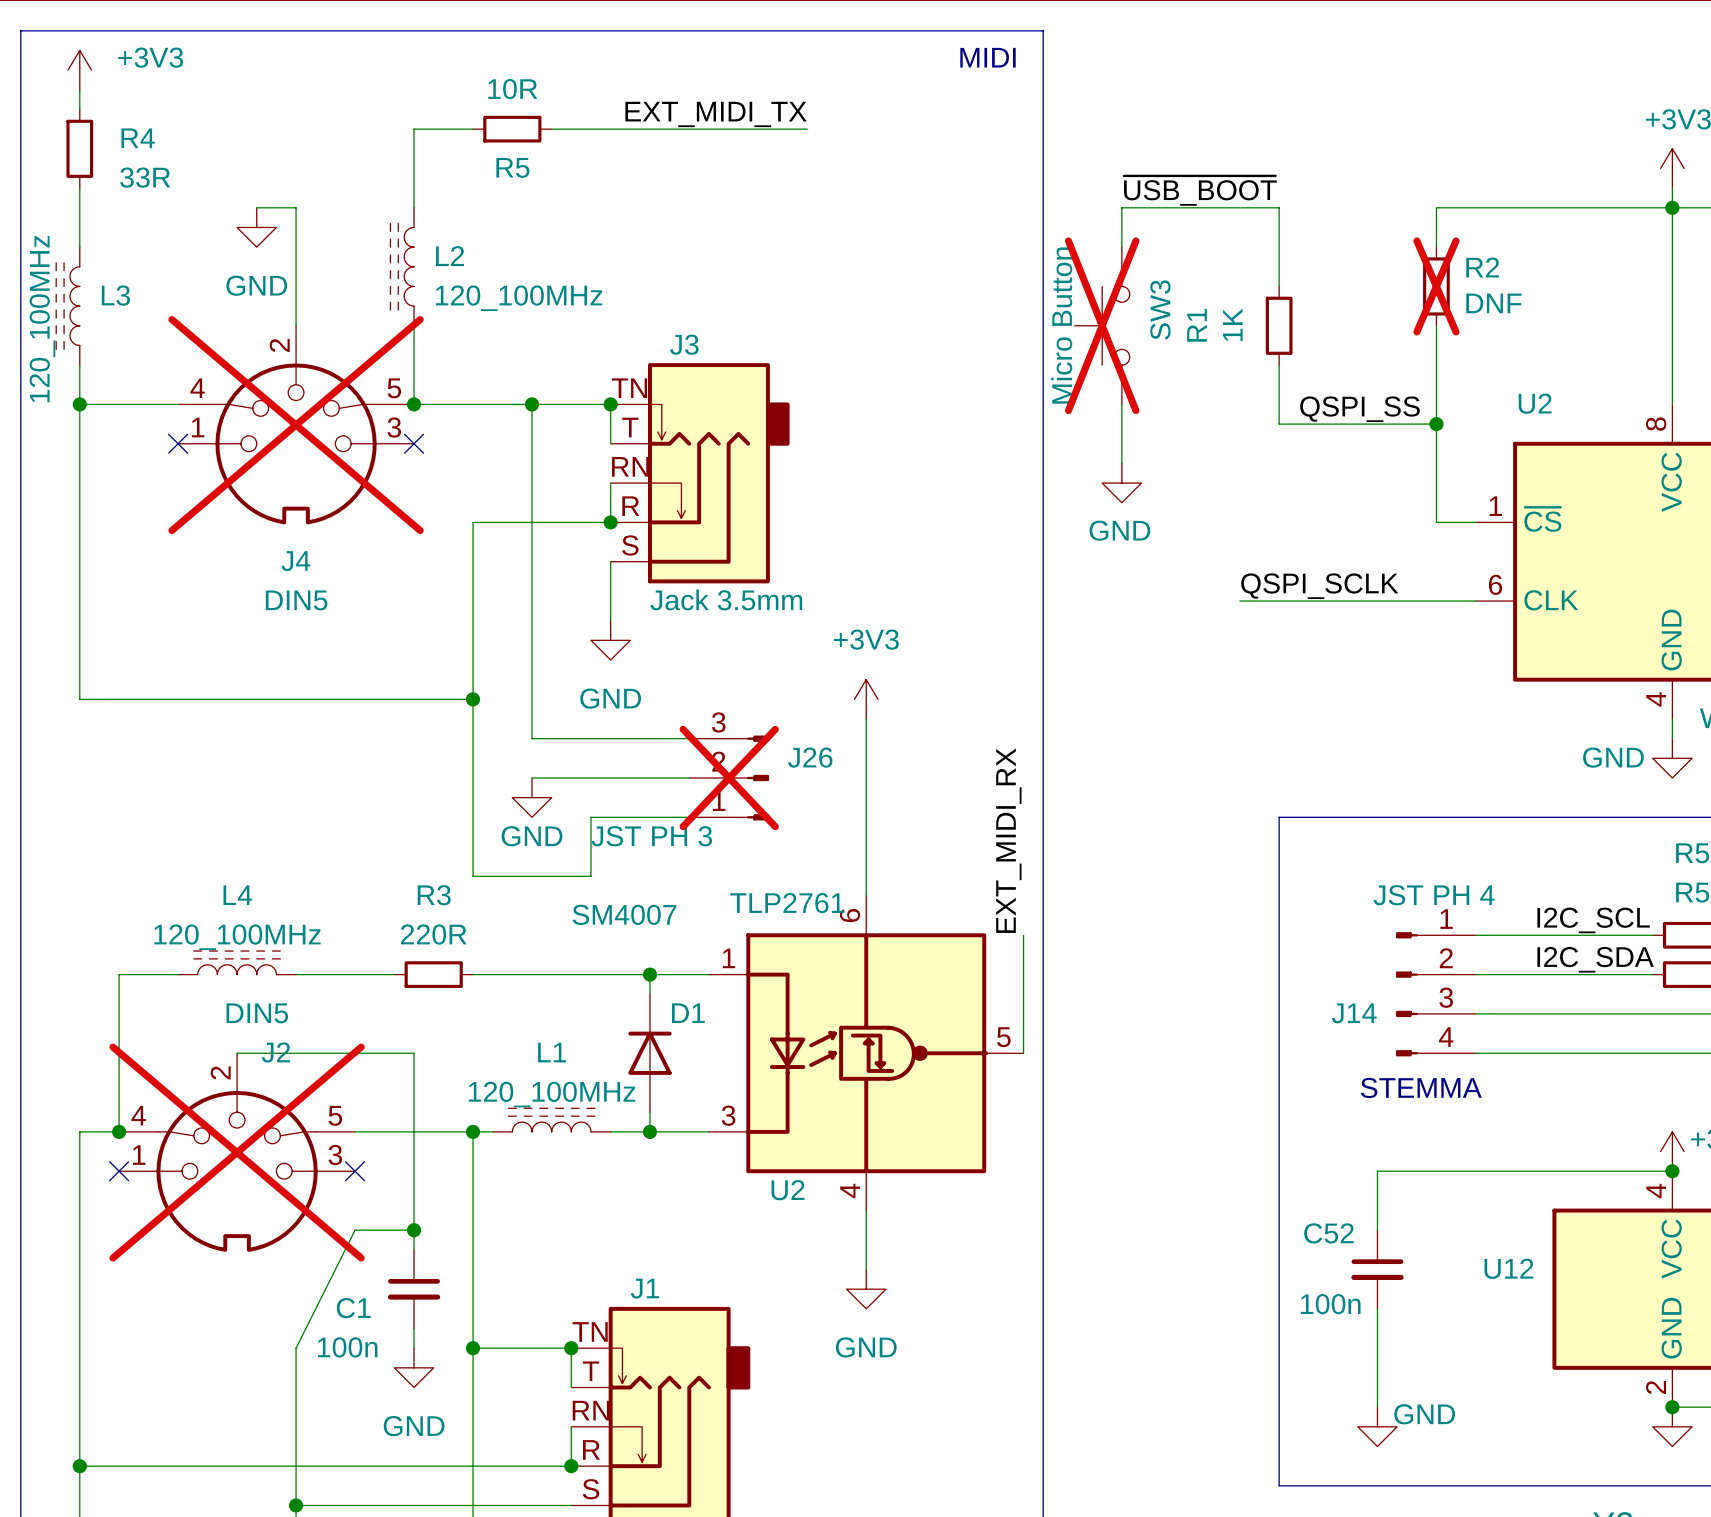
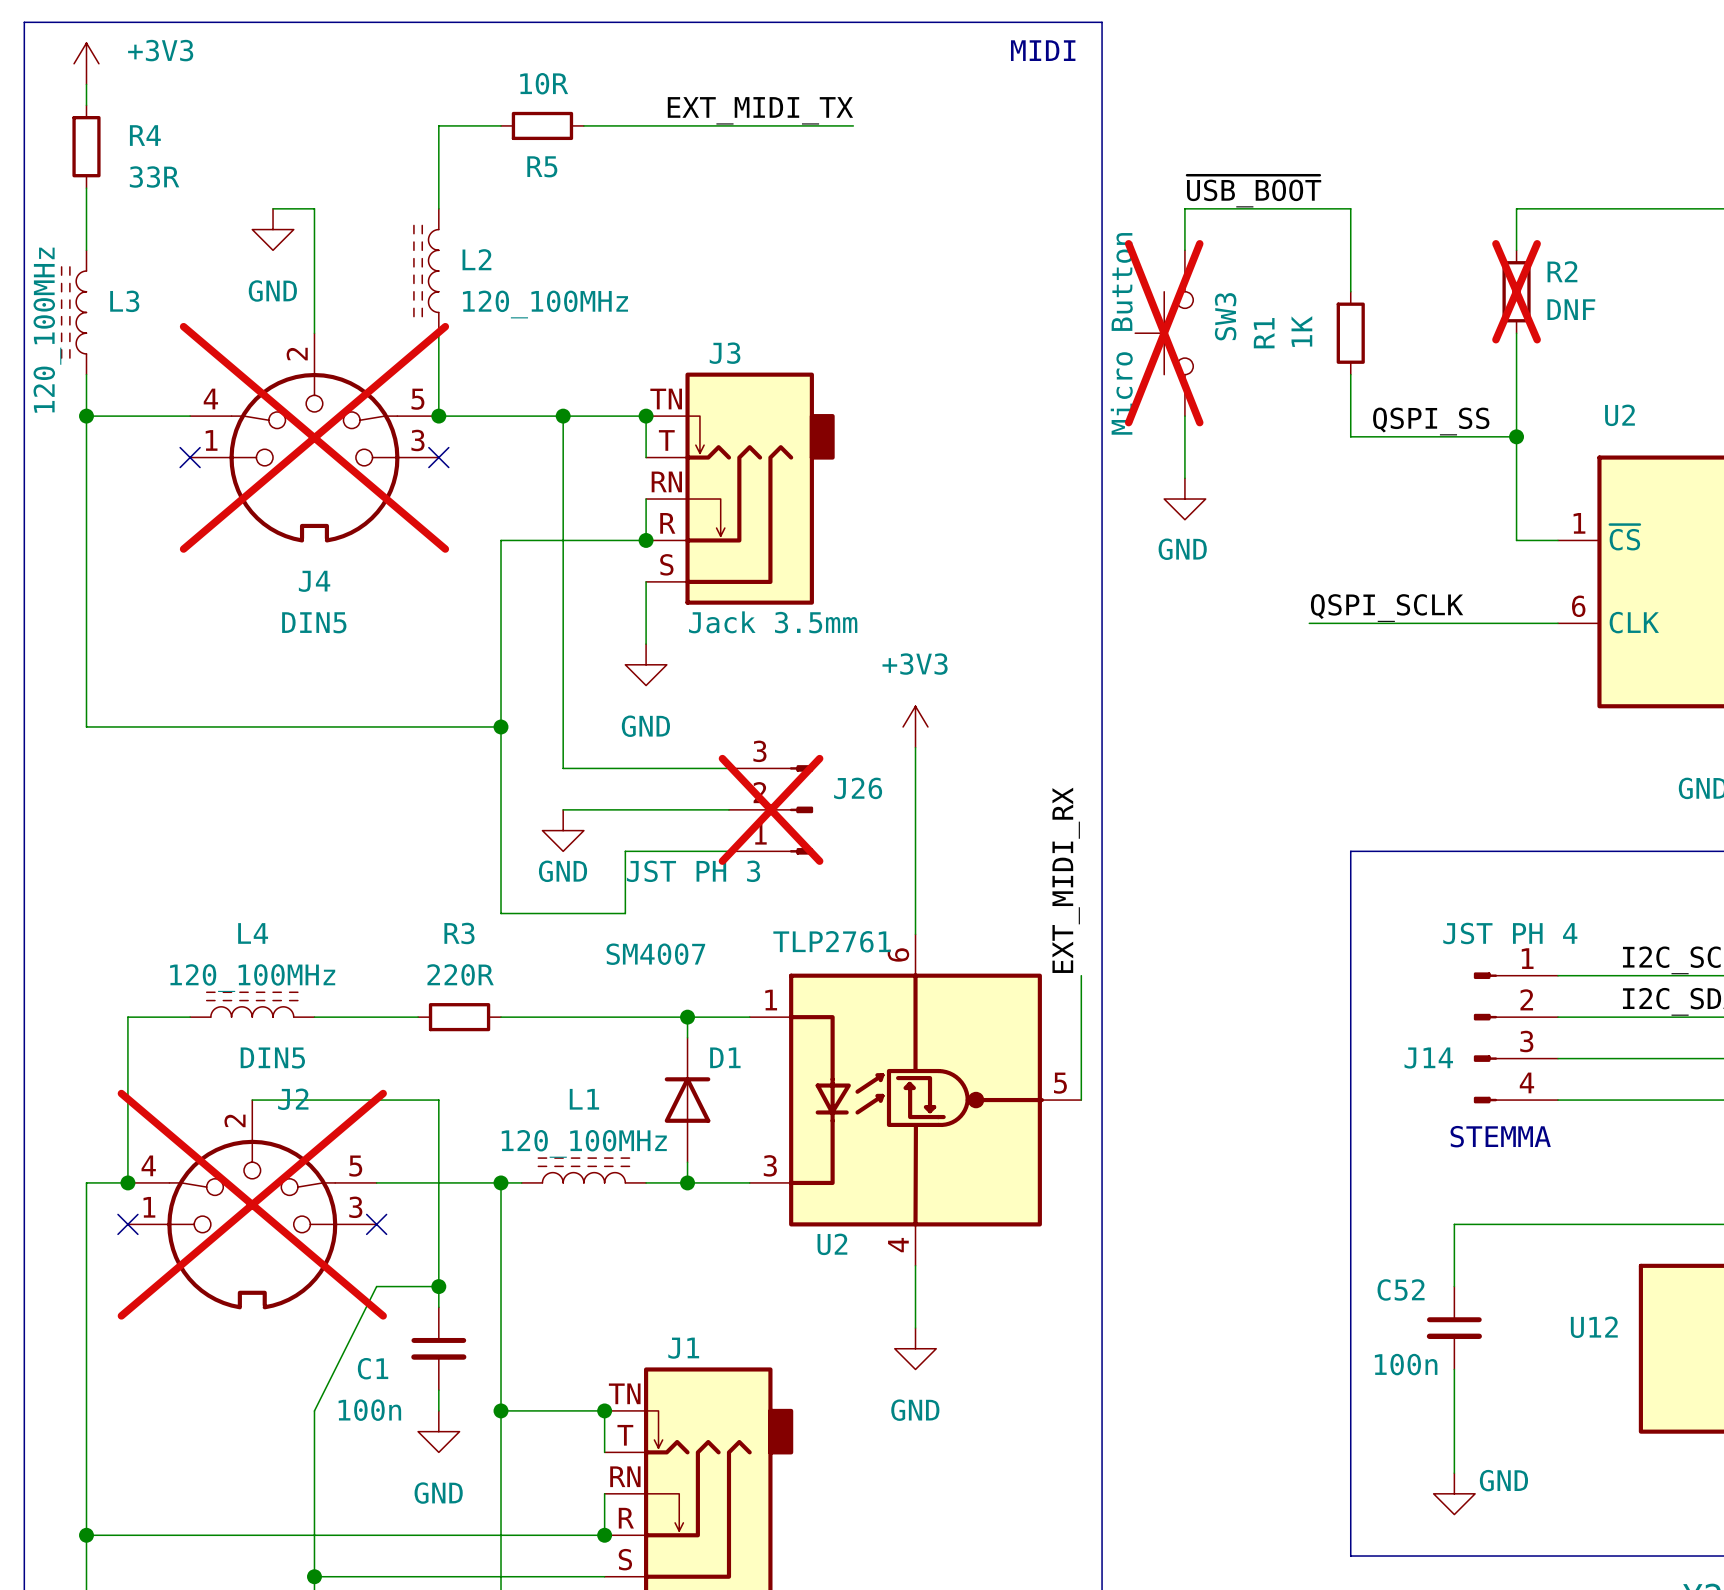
U2 symbol: [708, 895, 1024, 1211] -> [749, 934, 1082, 1266]

